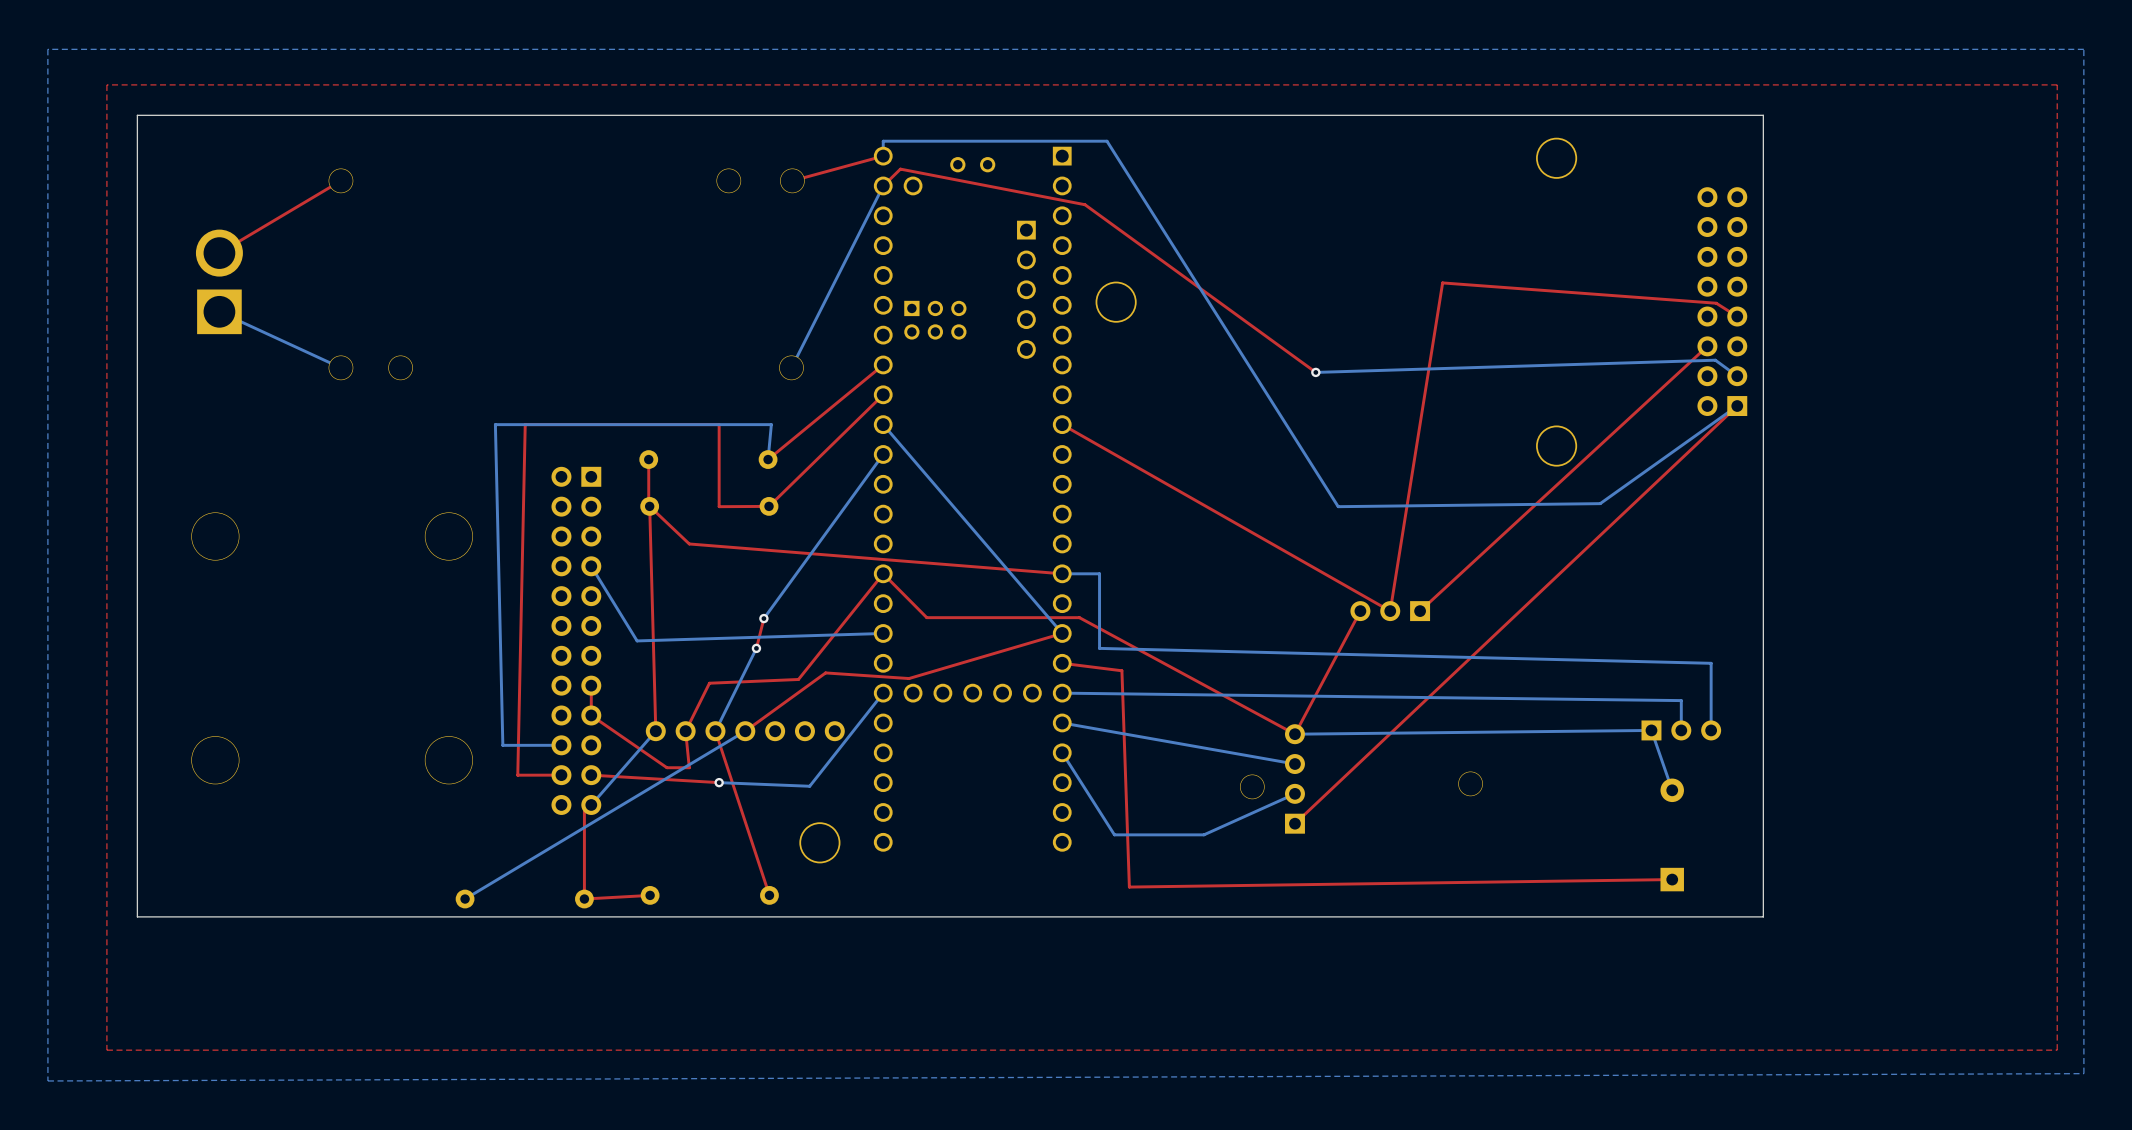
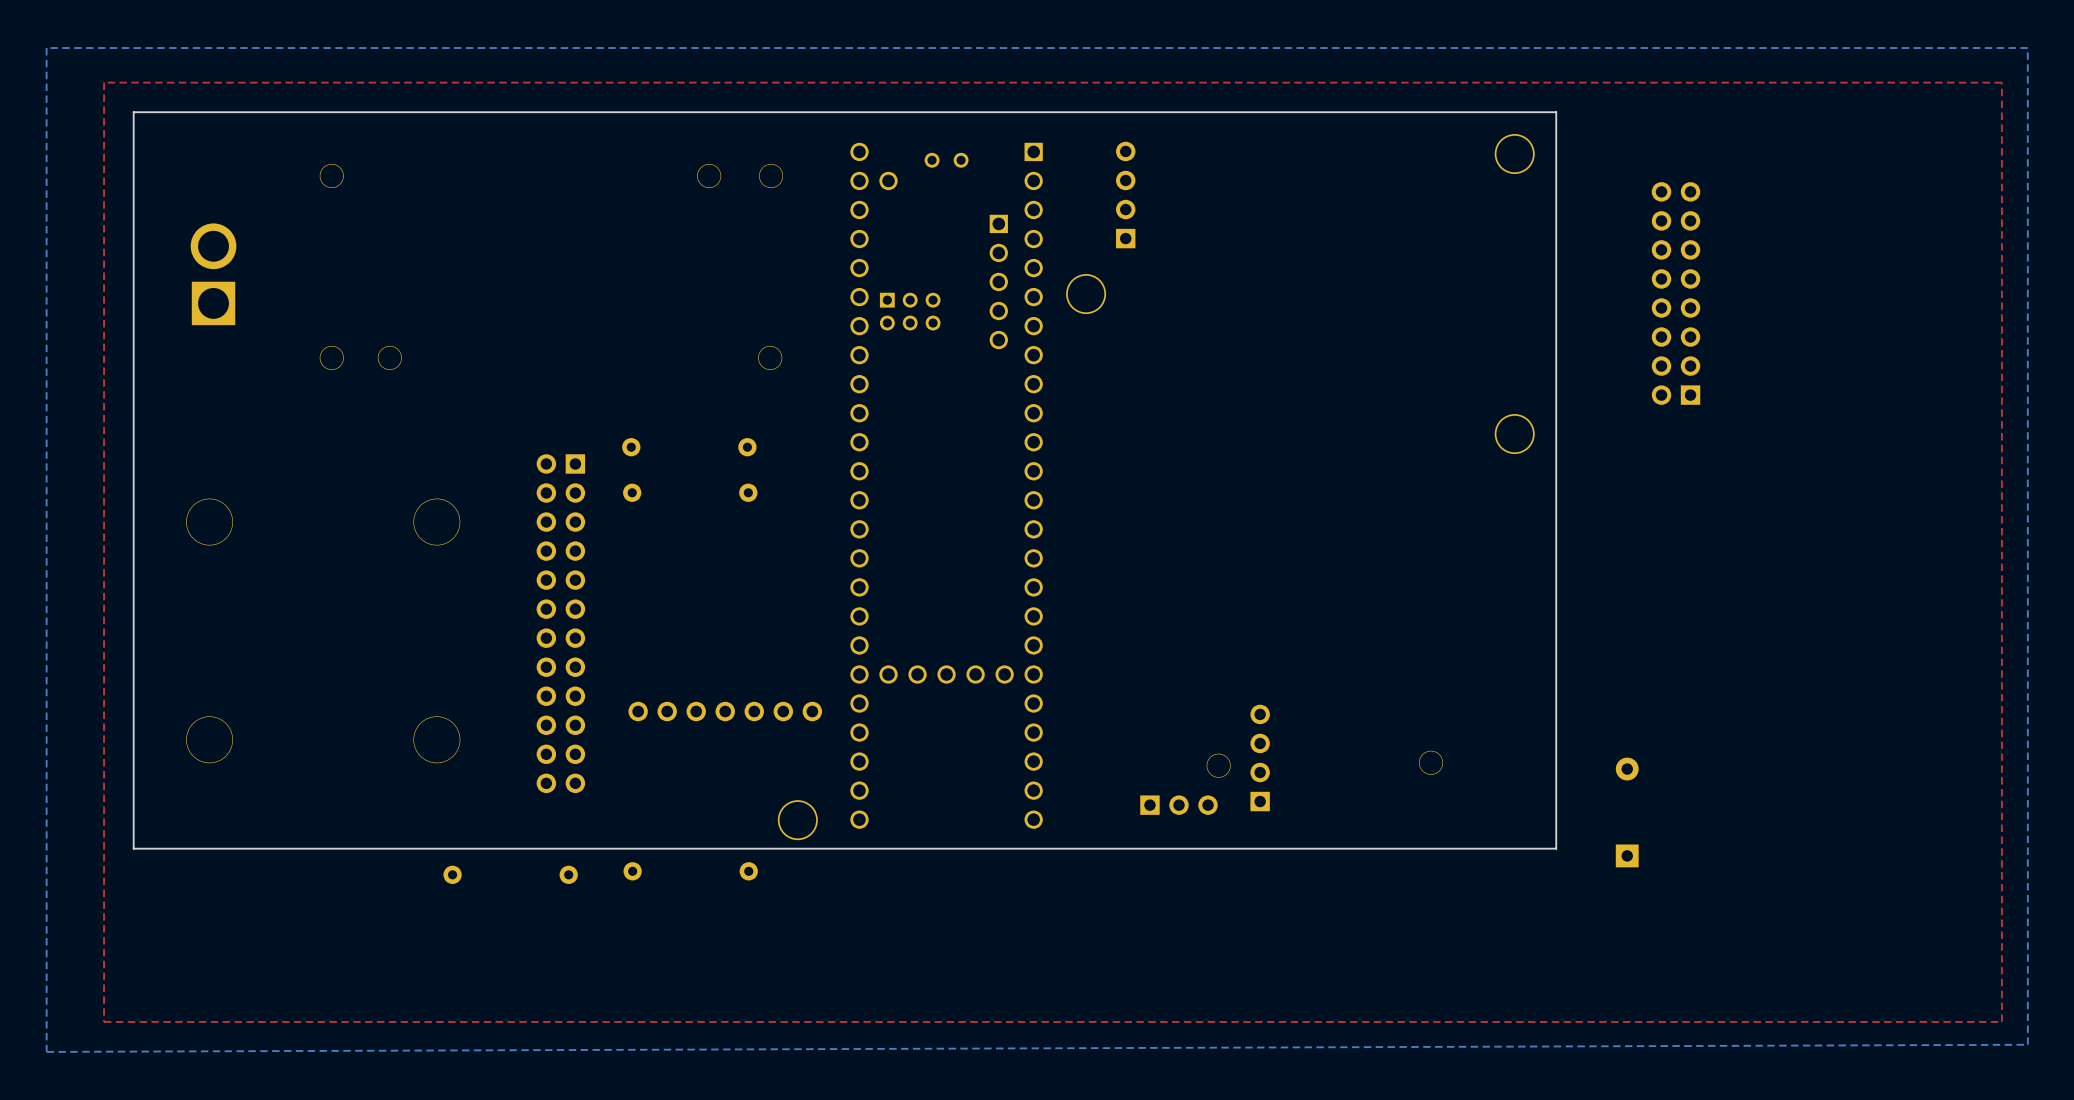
board edge: (1599, 115) (1763, 115) (1763, 916) (137, 916) (137, 872) -> (1556, 112) (1556, 848) (133, 848)
top track: (883, 156) (792, 180) -> none
bottom track: (883, 156) (883, 141) (1107, 141) (1338, 506) (1600, 503) (1737, 406) -> none
top track: (340, 180) (219, 253) -> none
top track: (883, 185) (900, 169) (1084, 204) (1315, 372) -> none
bottom track: (883, 185) (791, 367) -> none
part: none -> (1125, 195)
bottom track: (219, 311) (340, 367) -> none
top track: (1737, 316) (1716, 303) (1442, 282) (1390, 611) (1062, 424) -> none
top track: (1707, 346) (1420, 611) -> none
top track: (883, 364) (768, 459) -> none
bottom track: (1315, 372) (1715, 360) (1737, 376) -> none
via: (1315, 372) -> none
top track: (883, 394) (769, 506) (719, 506) (719, 424) (525, 424) (517, 775) (561, 775) -> none
top track: (1737, 406) (1294, 823) -> none
bottom track: (883, 424) (1062, 633) -> none
bottom track: (883, 454) (763, 618) -> none
top track: (648, 459) (649, 506) -> none
bottom track: (768, 459) (771, 424) (495, 424) (502, 745) (561, 745) -> none
top track: (649, 506) (655, 731) -> none
top track: (649, 506) (689, 543) (1062, 573) -> none
bottom track: (591, 566) (637, 640) (883, 633) -> none
bottom track: (1062, 573) (1099, 573) (1099, 648) (1711, 663) (1711, 730) -> none
top track: (1360, 611) (1294, 734) (1079, 617) (926, 617) (883, 573) (798, 679) (709, 683) (685, 731) (689, 767) (666, 767) (591, 715) (591, 685) -> none
part: (1390, 611) -> none
top track: (763, 618) (756, 648) -> none
via: (763, 618) -> none
top track: (1062, 633) (909, 678) (825, 672) (745, 731) -> none
bottom track: (756, 648) (715, 731) -> none
via: (756, 648) -> none
top track: (1062, 663) (1121, 670) (1129, 887) (1672, 879) -> none
bottom track: (883, 693) (809, 786) (719, 782) -> none
bottom track: (1062, 693) (1681, 700) (1681, 730) -> none
bottom track: (1062, 722) (1294, 764) -> none
part: (1681, 730) -> none
bottom track: (655, 731) (591, 804) -> none
top track: (715, 731) (769, 895) -> none
bottom track: (745, 731) (465, 899) -> none
bottom track: (1294, 734) (1651, 730) (1672, 790) -> none
bottom track: (1062, 752) (1114, 834) (1203, 834) (1294, 793) -> none
top track: (591, 775) (719, 782) -> none
via: (719, 782) -> none
top track: (591, 804) (584, 811) (584, 899) (650, 895) -> none
part: none -> (1179, 805)

